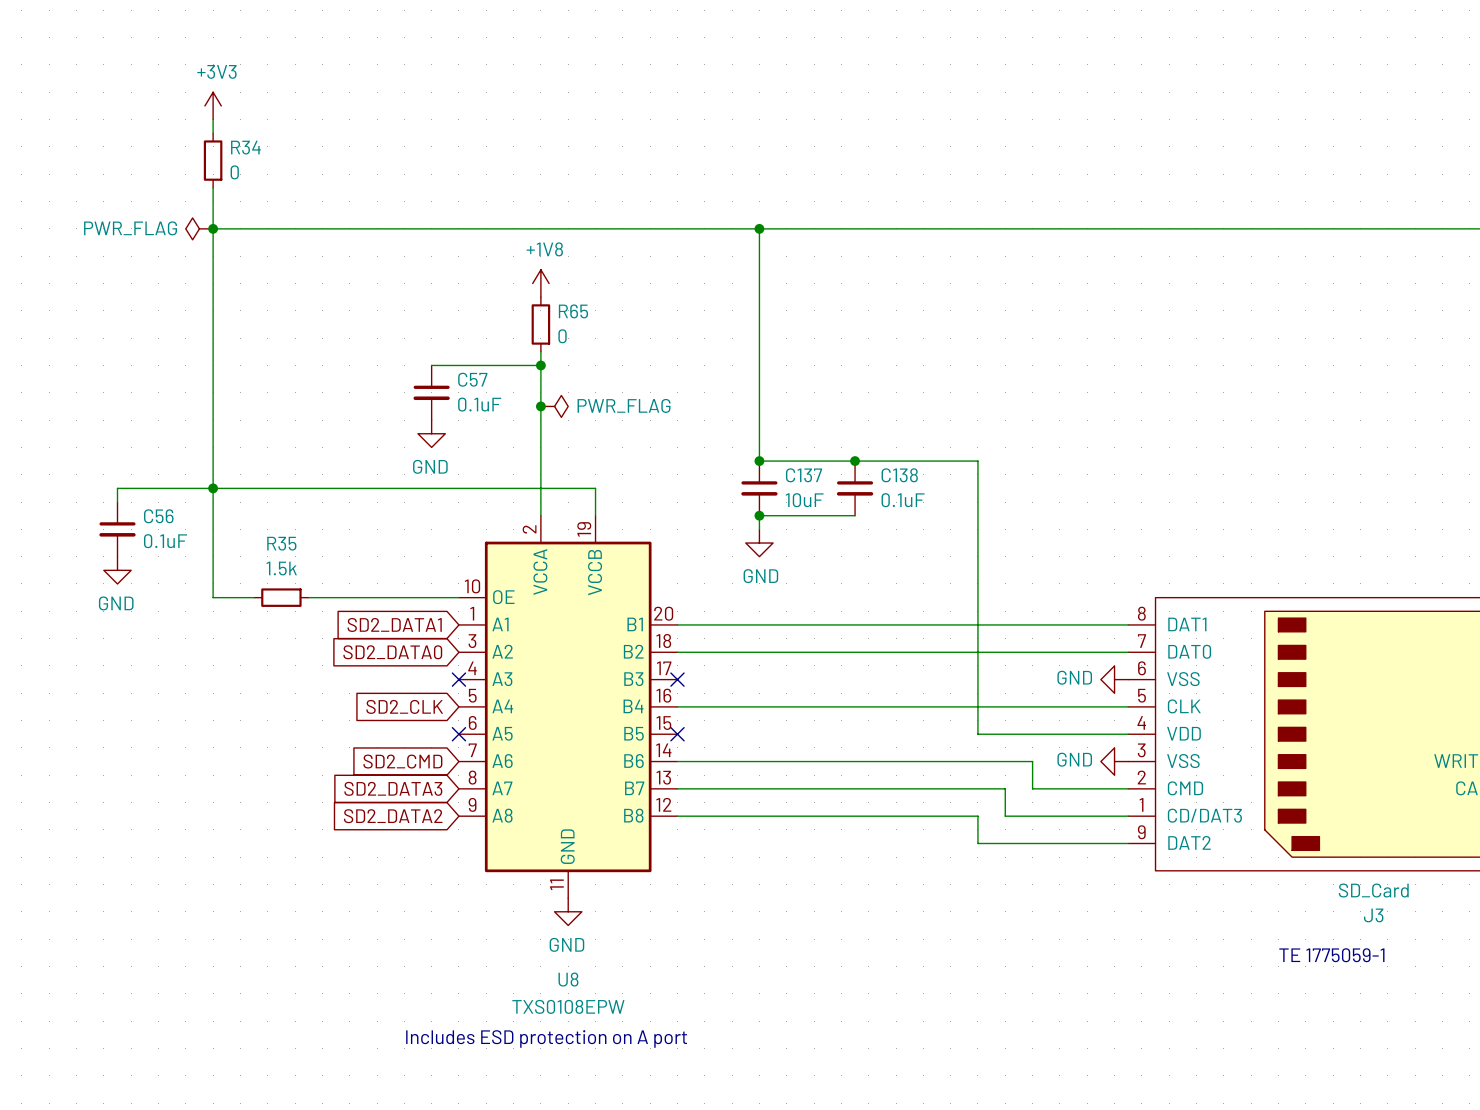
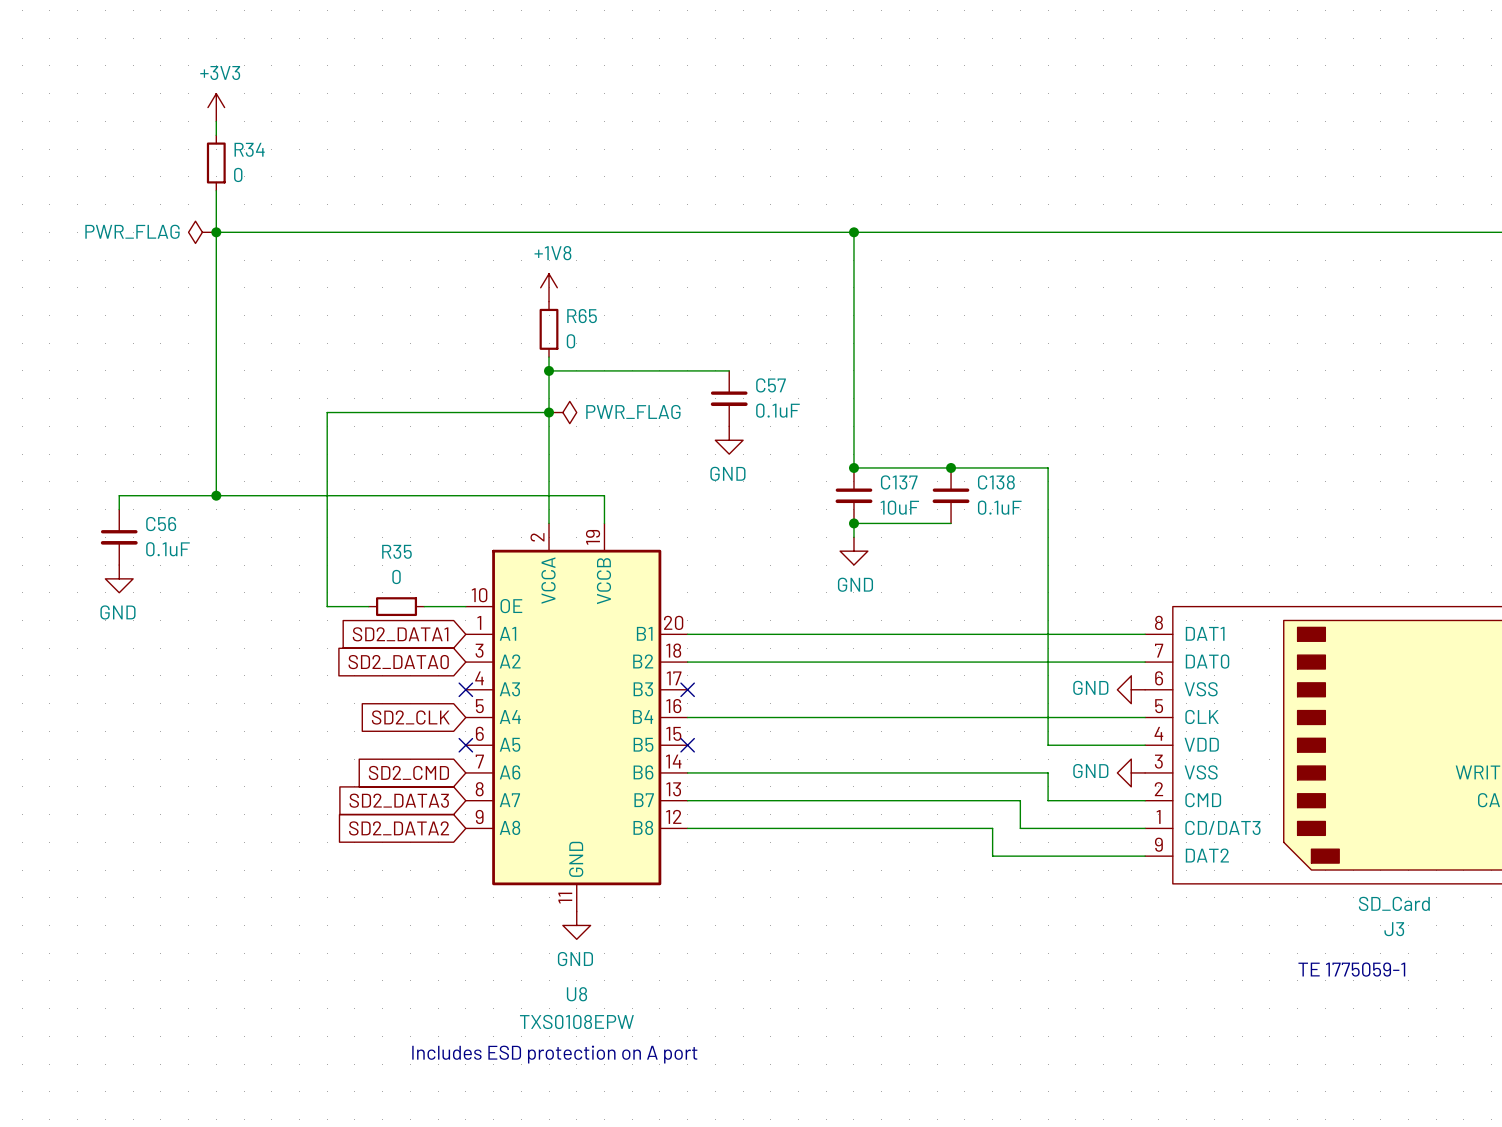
wire: (759, 228) (759, 461) (841, 461) -> (853, 232) (853, 467)
junction: (759, 228) -> none
junction: none -> (853, 232)
wire: (431, 365) (540, 365) -> (729, 370) (549, 370)
C57 position: (431, 392) -> (729, 398)
power symbol: GND (431, 433) -> none
power symbol: none -> GND (729, 440)
junction: (759, 461) -> none
junction position: (855, 461) -> (853, 467)
junction: none -> (951, 467)
wire: (977, 461) (977, 734) (1032, 734) -> (992, 467) (1048, 467) (1048, 745)
wire: (213, 488) (213, 597) (254, 597) -> none
C137 position: (759, 488) -> (853, 495)
C138 position: (855, 488) -> (951, 495)
junction: (759, 515) -> none
wire: (841, 515) (759, 515) (759, 529) -> (853, 523) (853, 537)
junction: none -> (853, 523)
wire: none -> (867, 523) (951, 523)
power symbol: GND (759, 543) -> none
power symbol: none -> GND (853, 551)
R35 value: 1.5k (281, 568) -> 0 (396, 576)
R35 position: (281, 597) -> (396, 606)
wire: (308, 597) (322, 597) -> (549, 412) (327, 412) (327, 606)
wire: (363, 597) (417, 597) -> none

